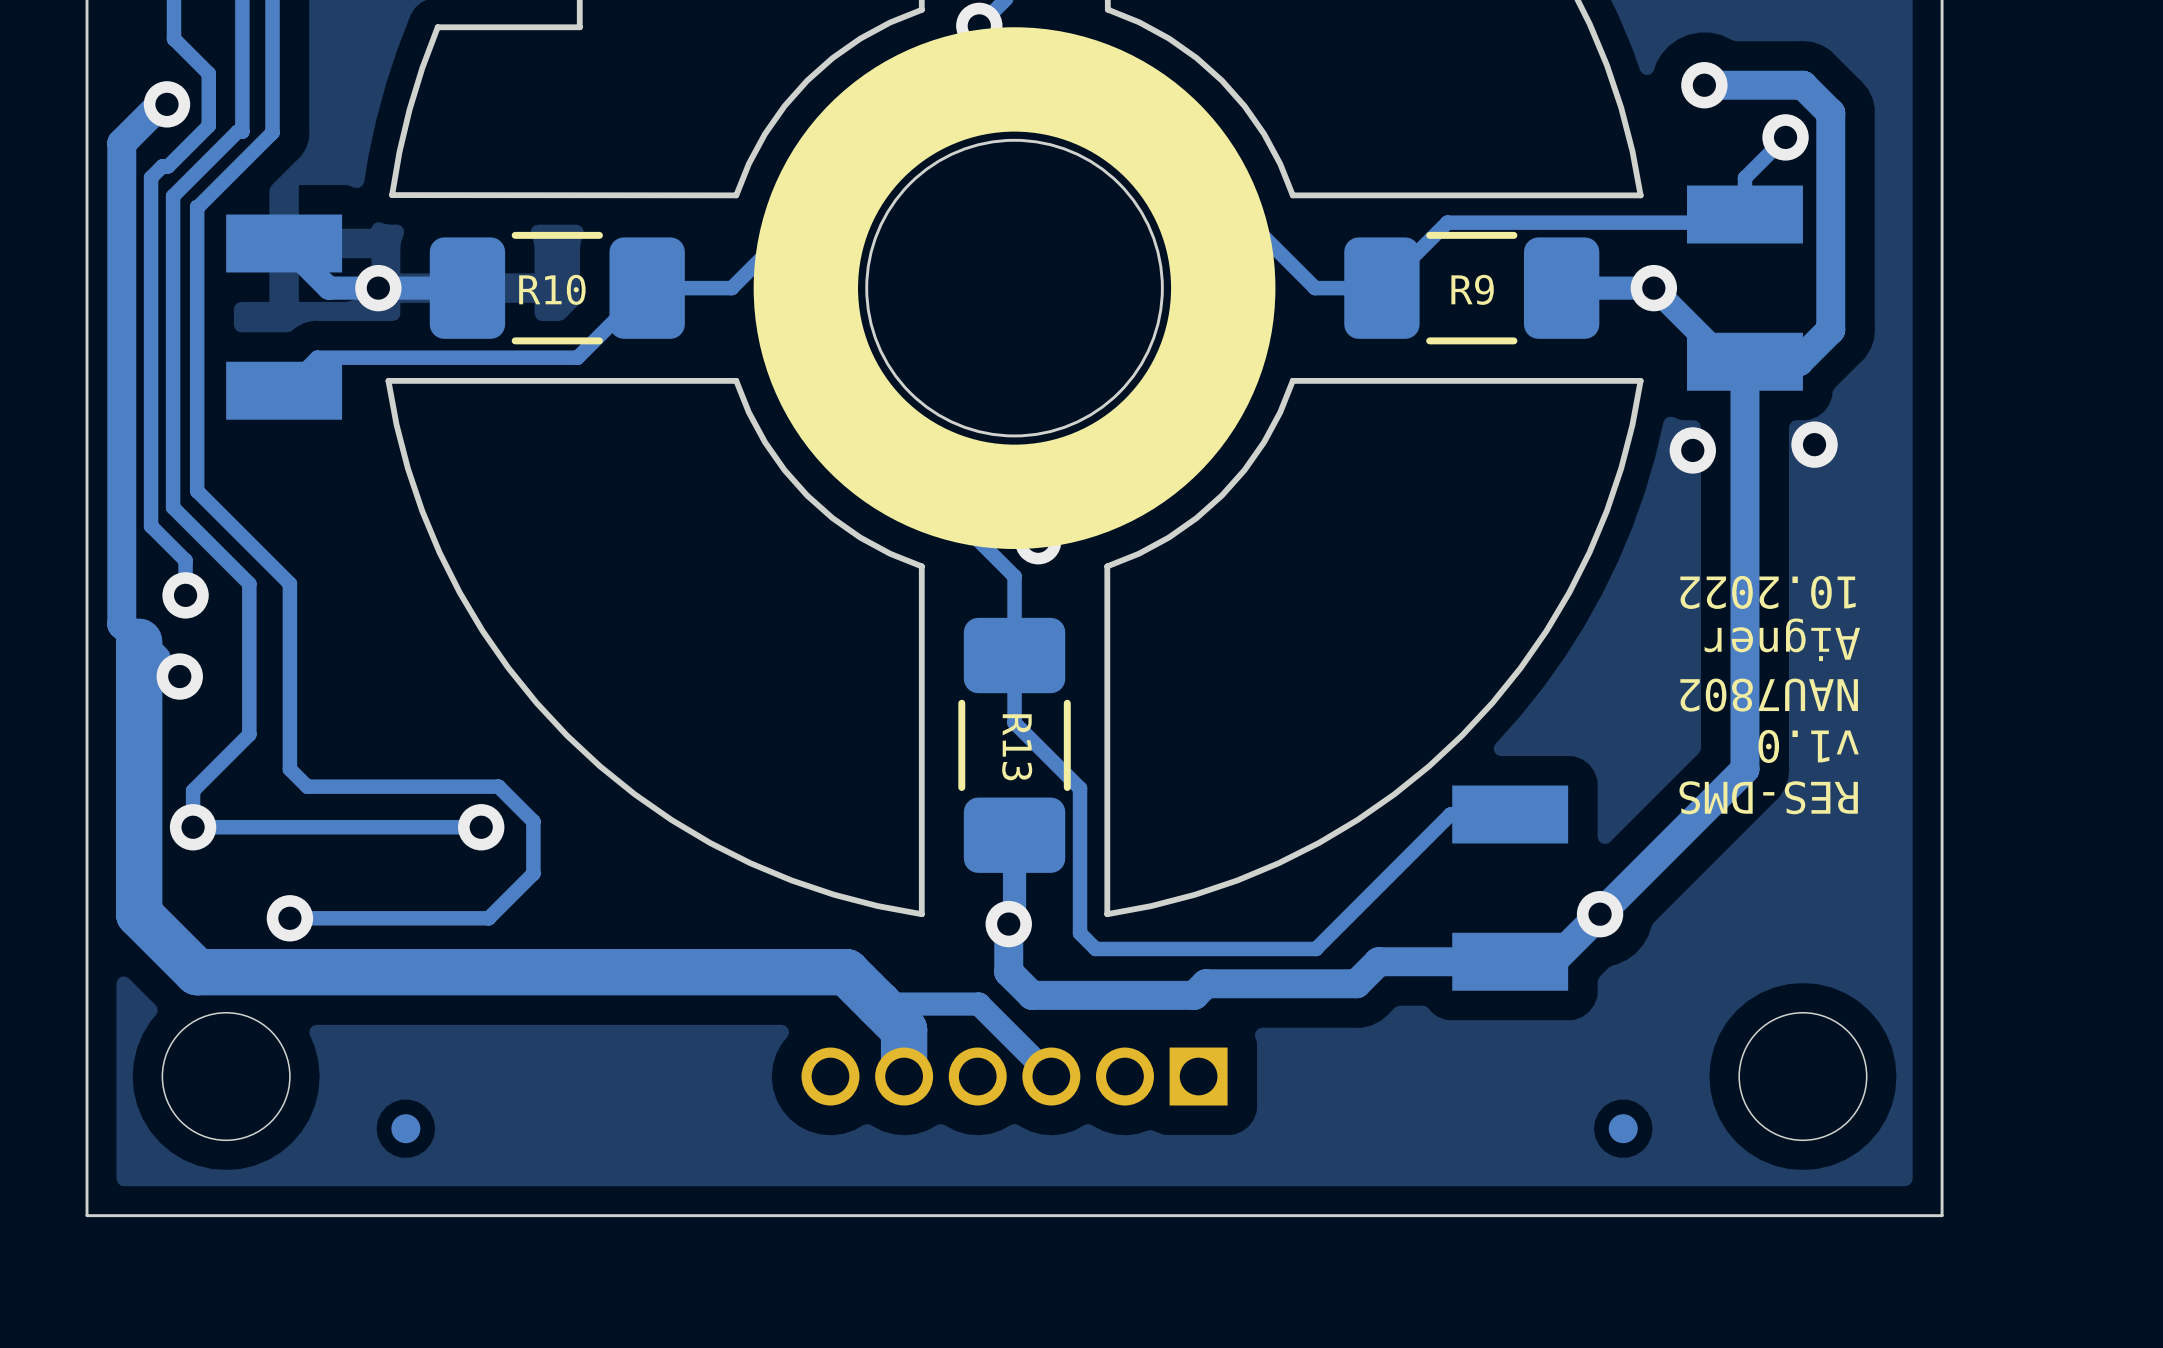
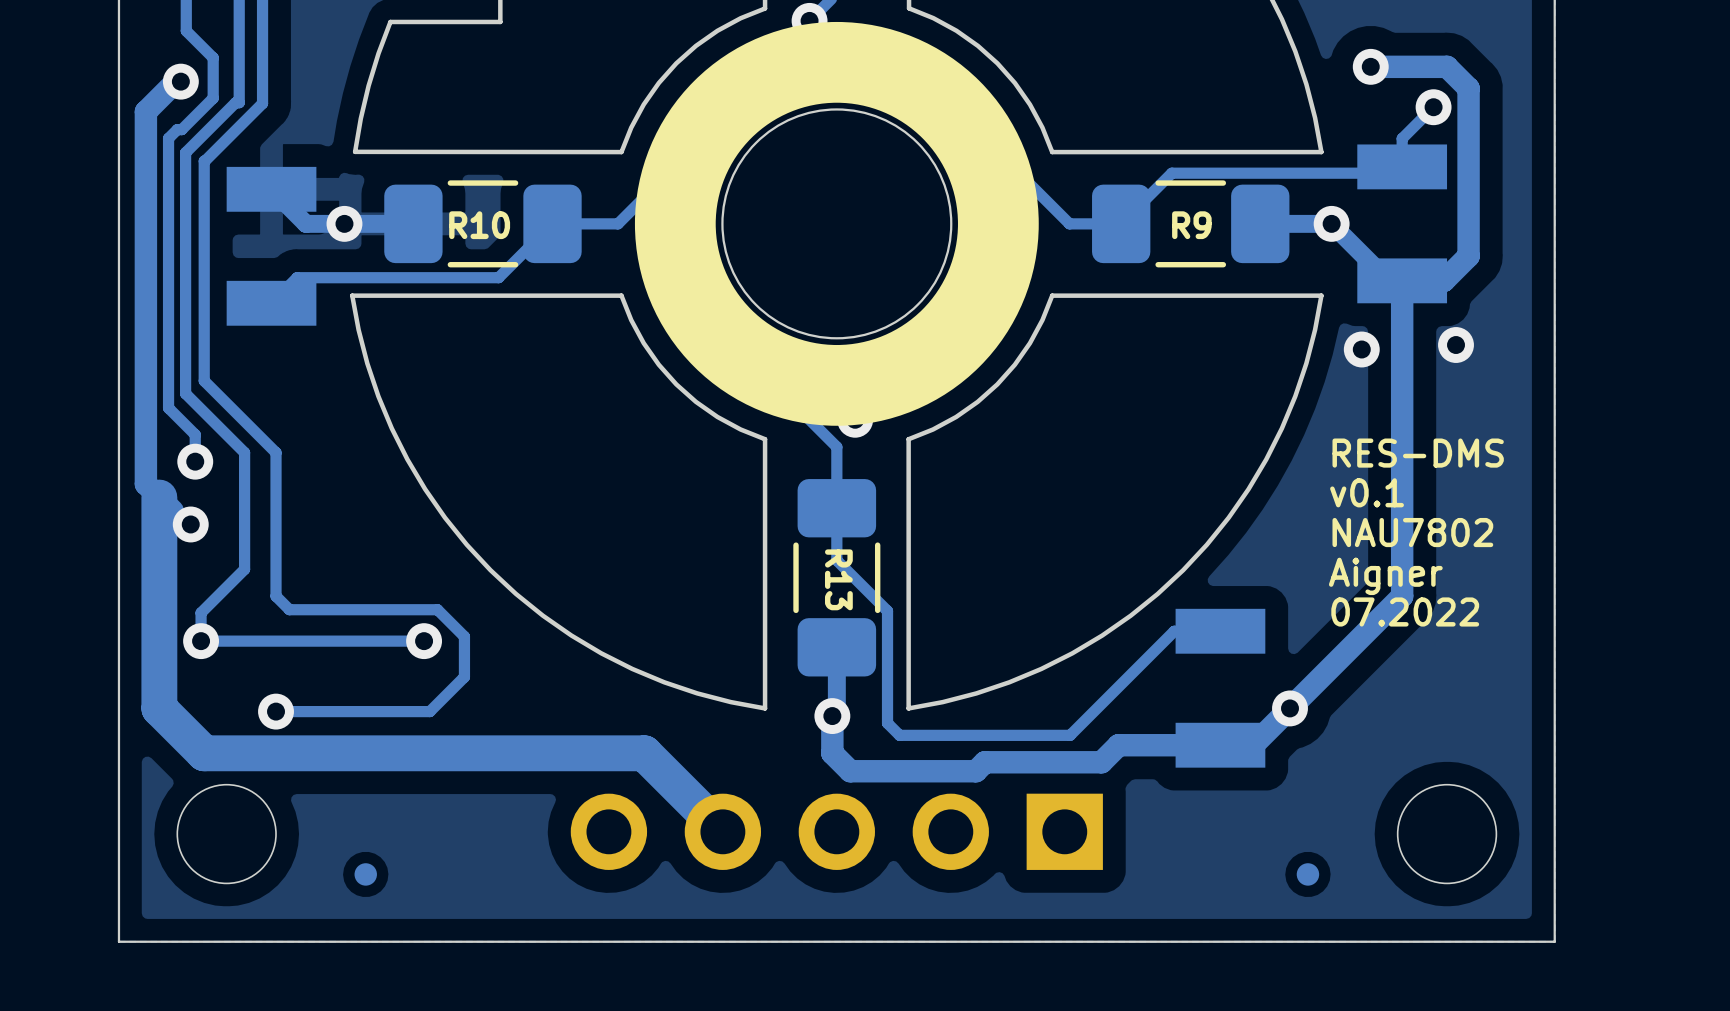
text: 10.2022 (1767, 592) -> none
text: none -> v0.1 (1367, 492)
text rotation: 0° (1782, 639) -> 180° (1385, 576)
text rotation: 0° (1769, 695) -> 180° (1412, 532)
text: v1.0 (1808, 746) -> none
text: none -> 07.2022 (1405, 611)
text rotation: 0° (1768, 797) -> 180° (1418, 453)
track: (765, 972) (846, 972) (904, 1029) (904, 1076) -> (644, 753) (722, 831)
track: (878, 1004) (978, 1004) (1051, 1076) -> none
part footprint: [801, 1047, 1228, 1106] -> [570, 793, 1103, 870]

